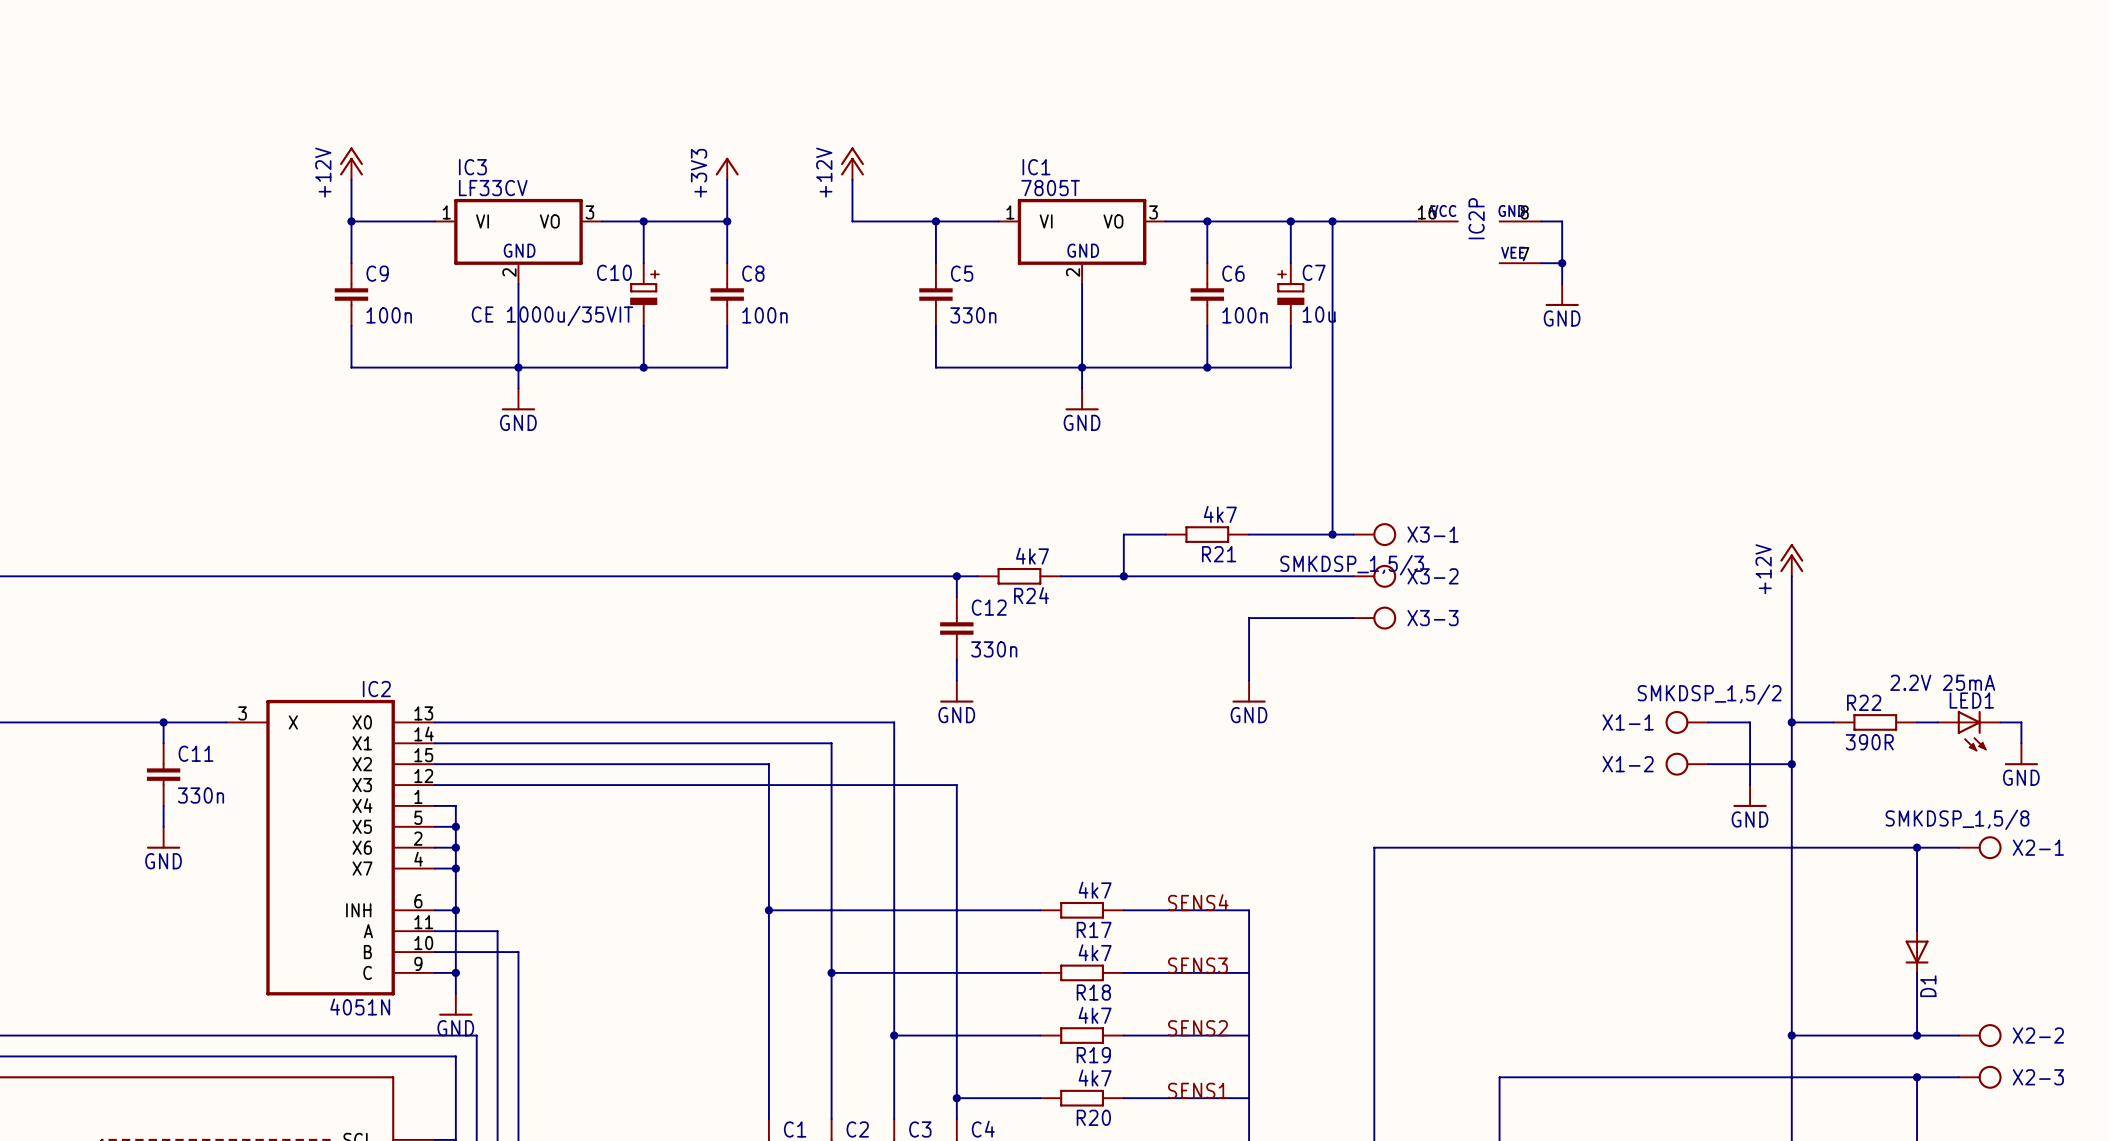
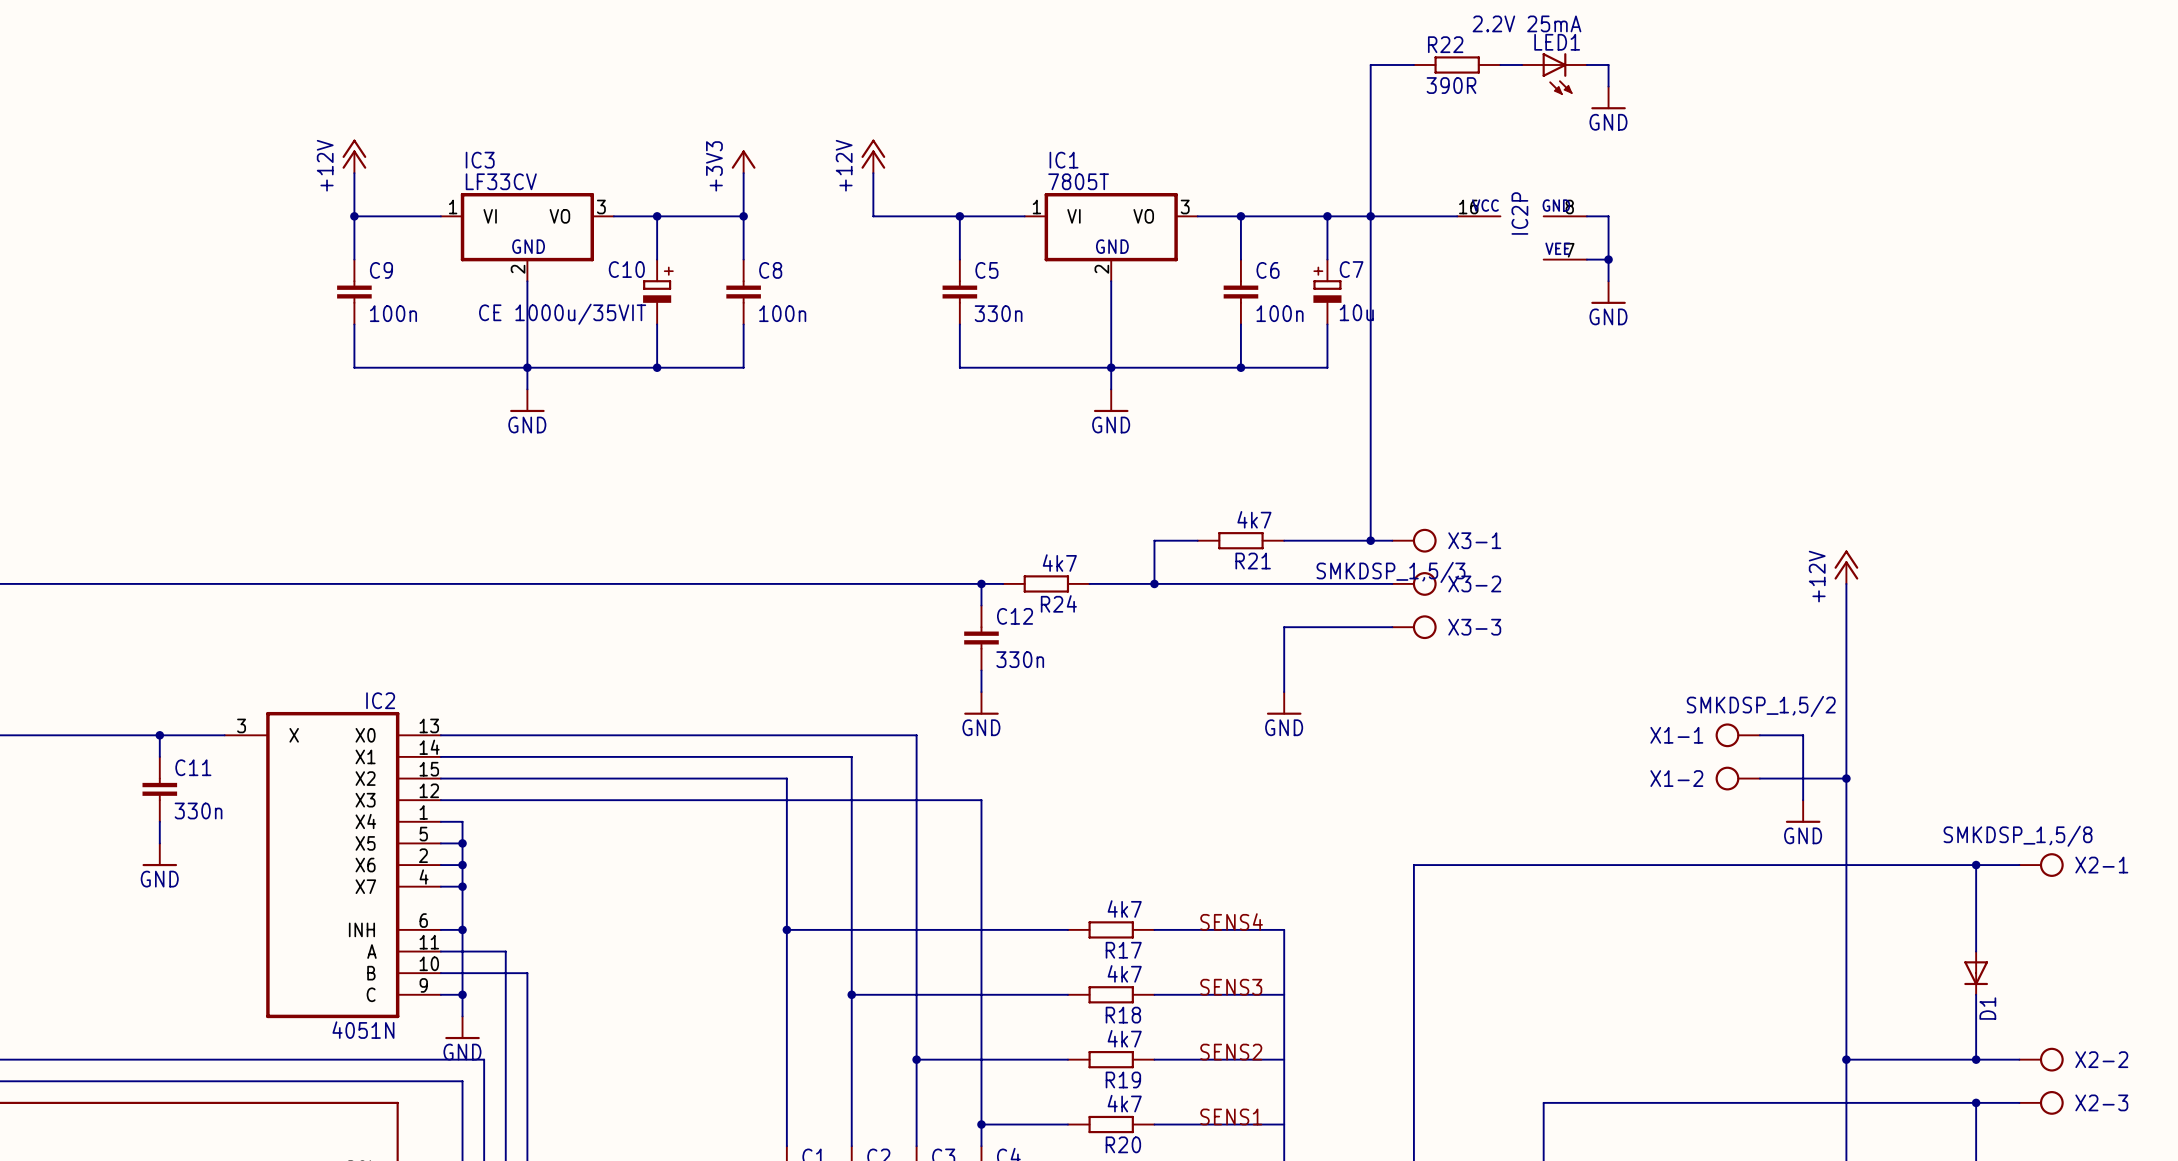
wire: none -> (1413, 64) (1370, 64) (1370, 216)
wire: none -> (1500, 64) (1522, 64)
wire: none -> (1586, 64) (1608, 64) (1608, 86)
power symbol: none -> GND (1608, 97)
wire: (1791, 722) (1833, 722) -> none
junction: (1791, 722) -> none
R22 position: (1875, 722) -> (1457, 64)
wire: (1917, 722) (1937, 722) -> none
wire: (2000, 722) (2021, 722) (2021, 743) -> none
LED1 position: (1969, 731) -> (1554, 73)
power symbol: GND (2021, 754) -> none

